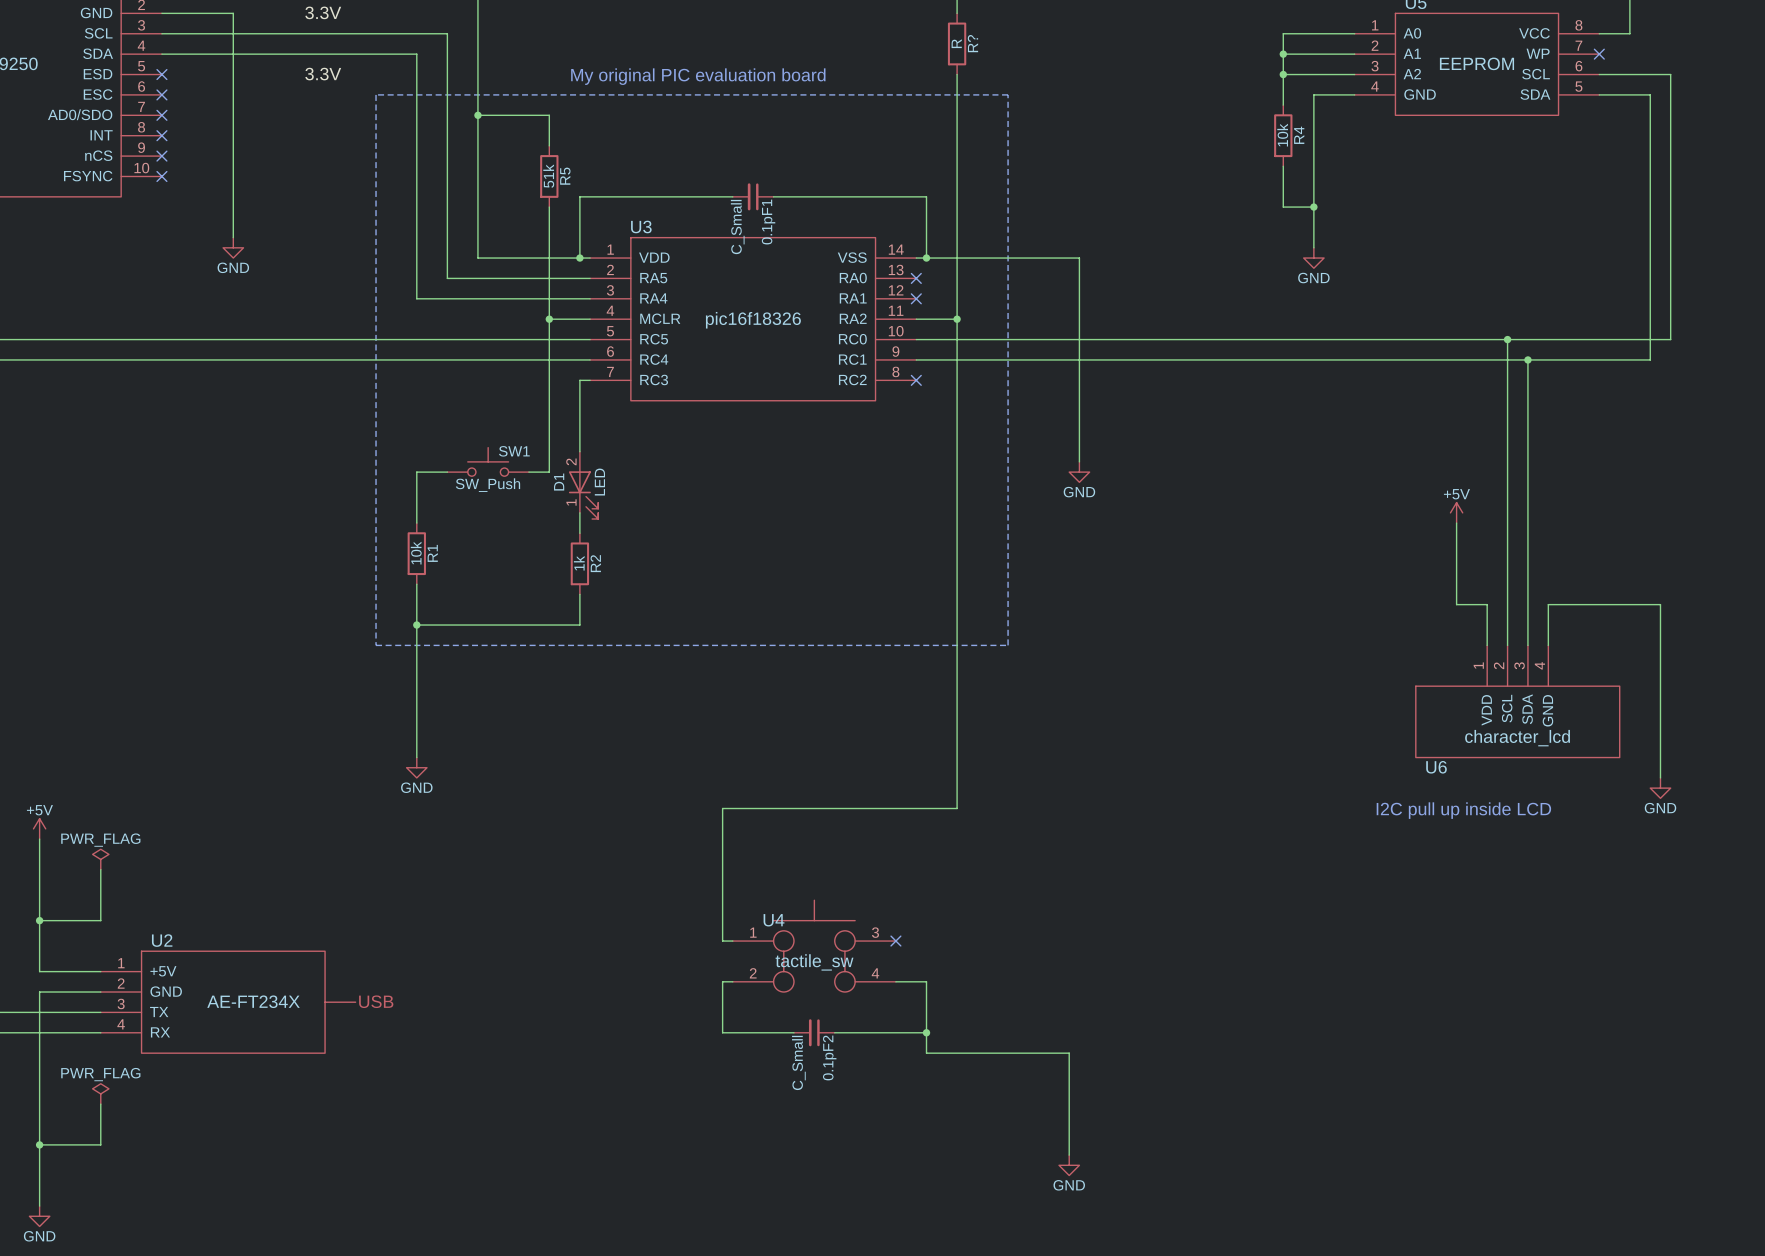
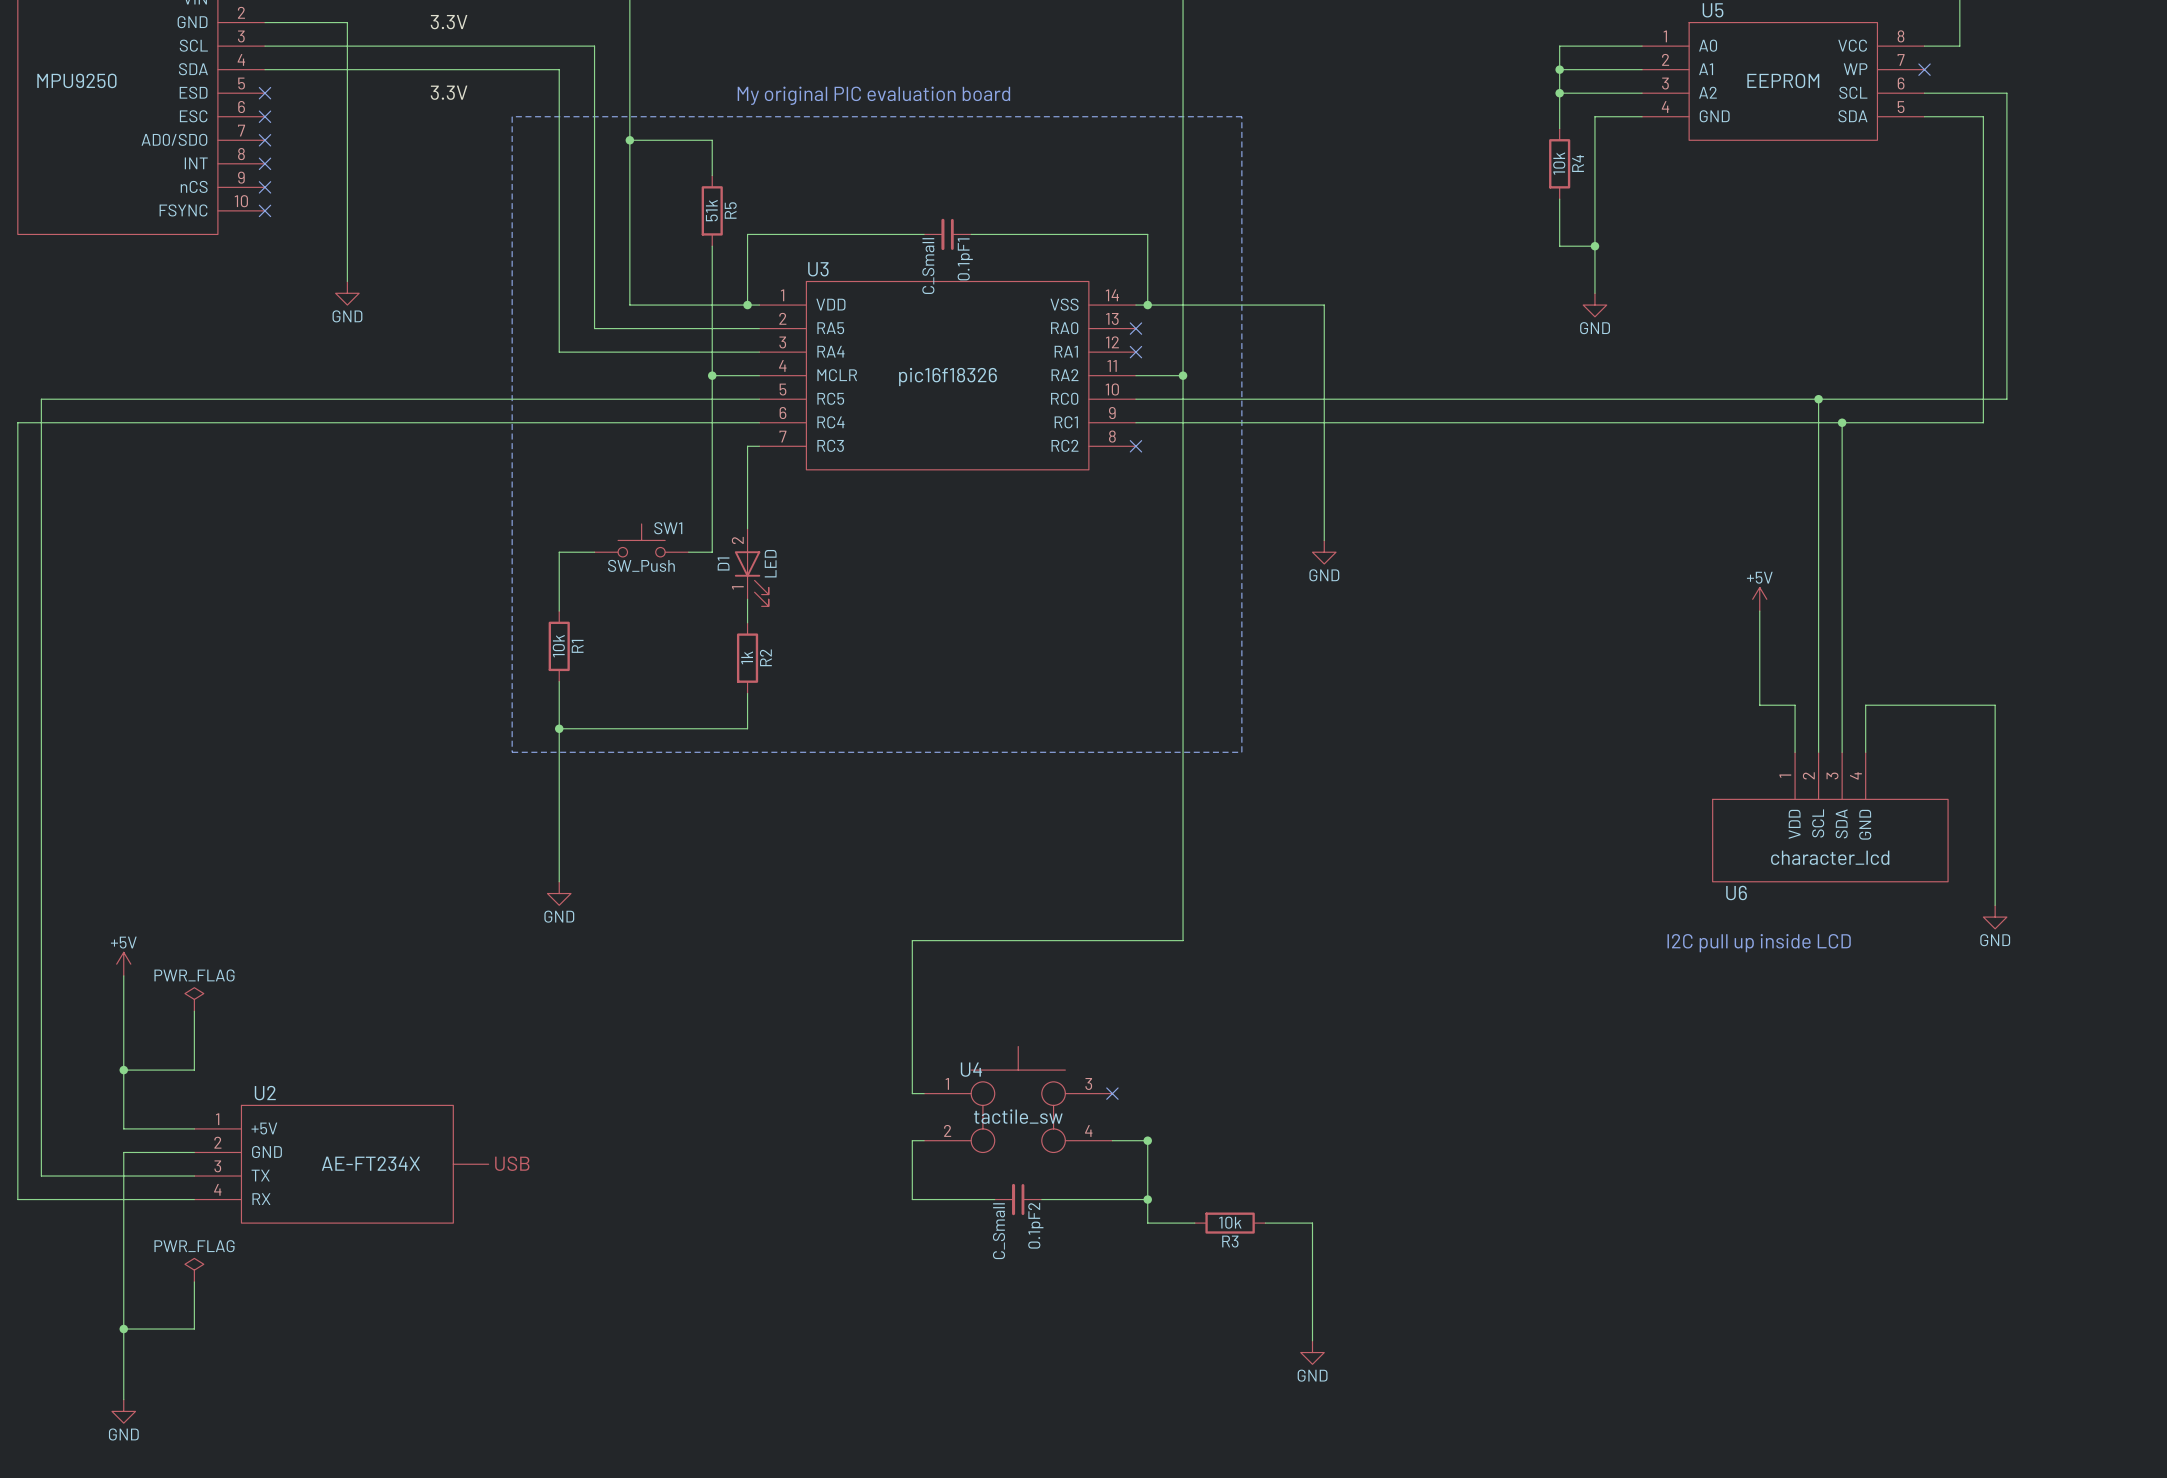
wire: none -> (1183, 22) (1183, 93)
R?: R (957, 43) -> none
junction: none -> (1147, 1140)
wire: (967, 1053) (1028, 1053) -> none
R3: none -> 10k (1230, 1223)

